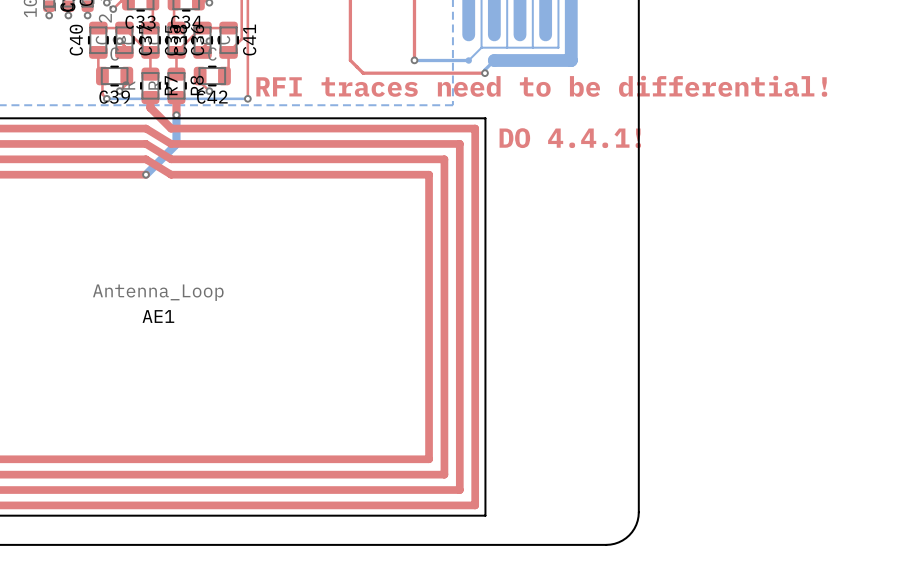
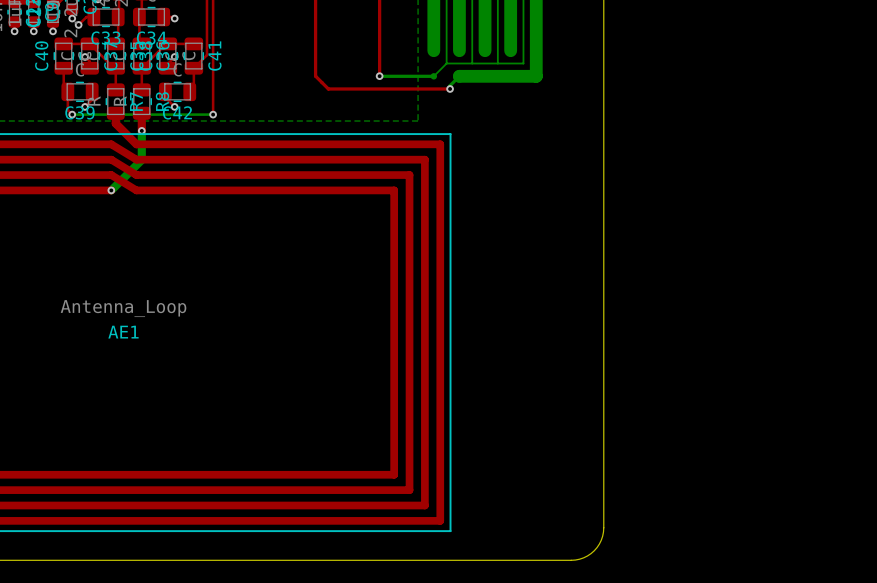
text: RFI traces need to be differential! (541, 86) -> none
text: DO 4.4.1! (570, 138) -> none

